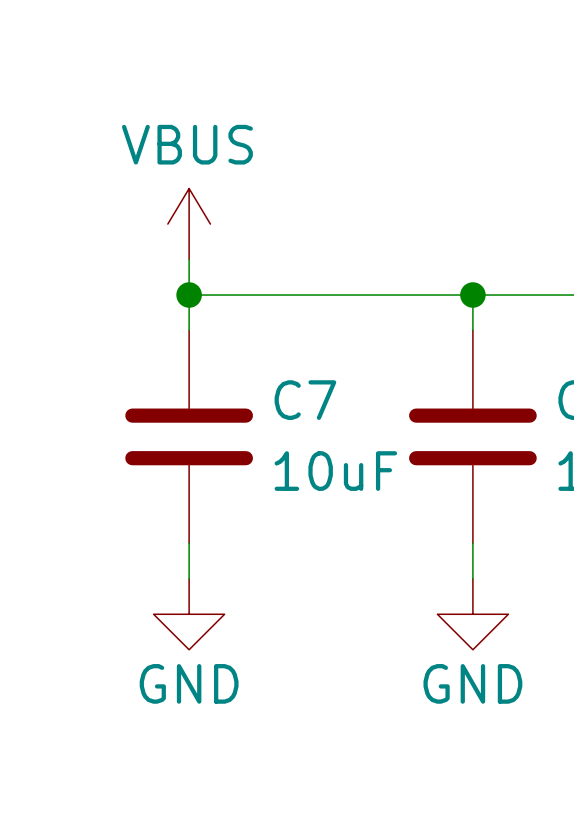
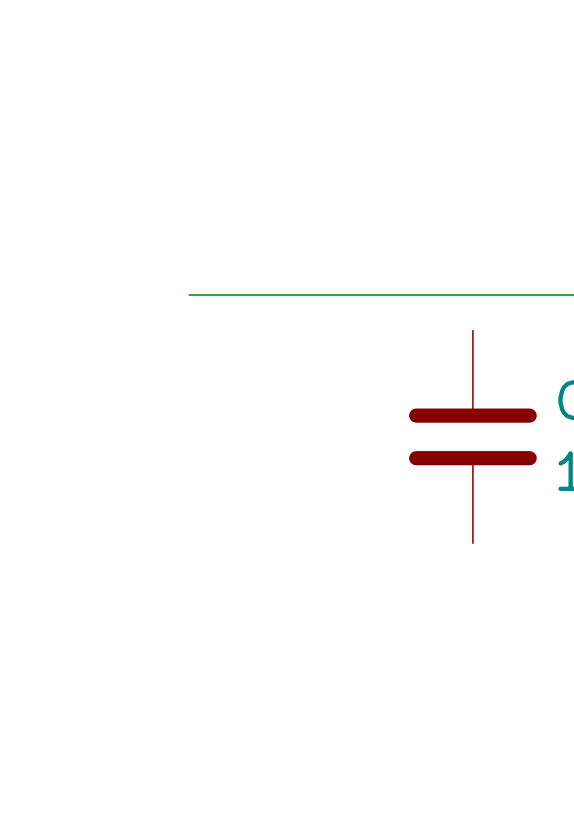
power symbol: VBUS (189, 224) -> none
wire: (189, 259) (189, 330) -> none
junction: (189, 295) -> none
wire: (472, 295) (472, 330) -> none
junction: (472, 295) -> none
C7: 10uF (189, 436) -> none
wire: (189, 543) (189, 578) -> none
wire: (472, 543) (472, 578) -> none
power symbol: GND (189, 614) -> none
power symbol: GND (472, 614) -> none

